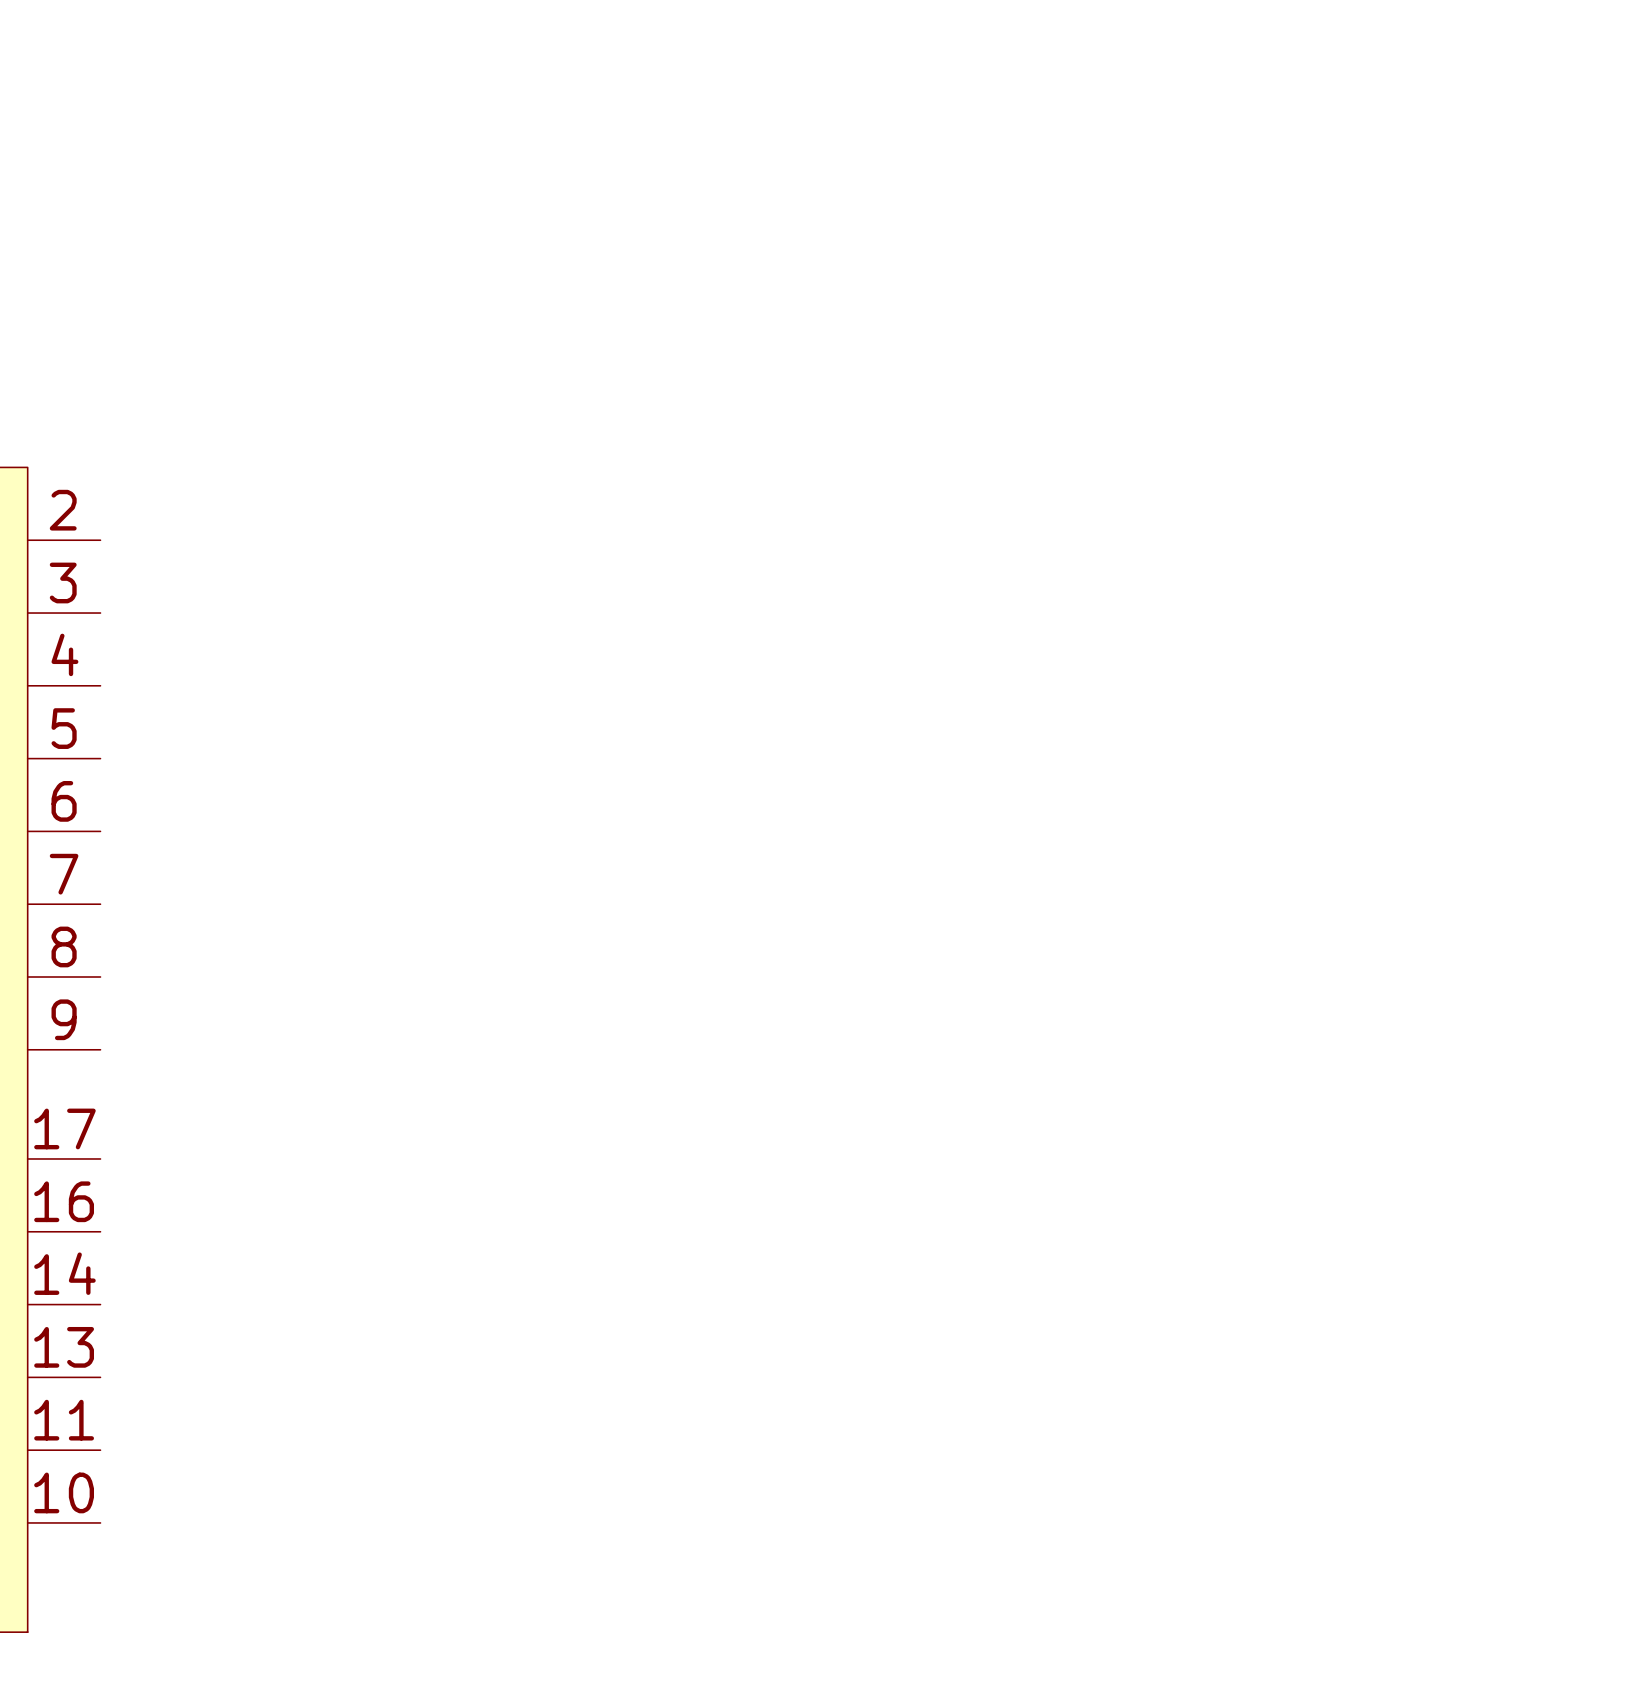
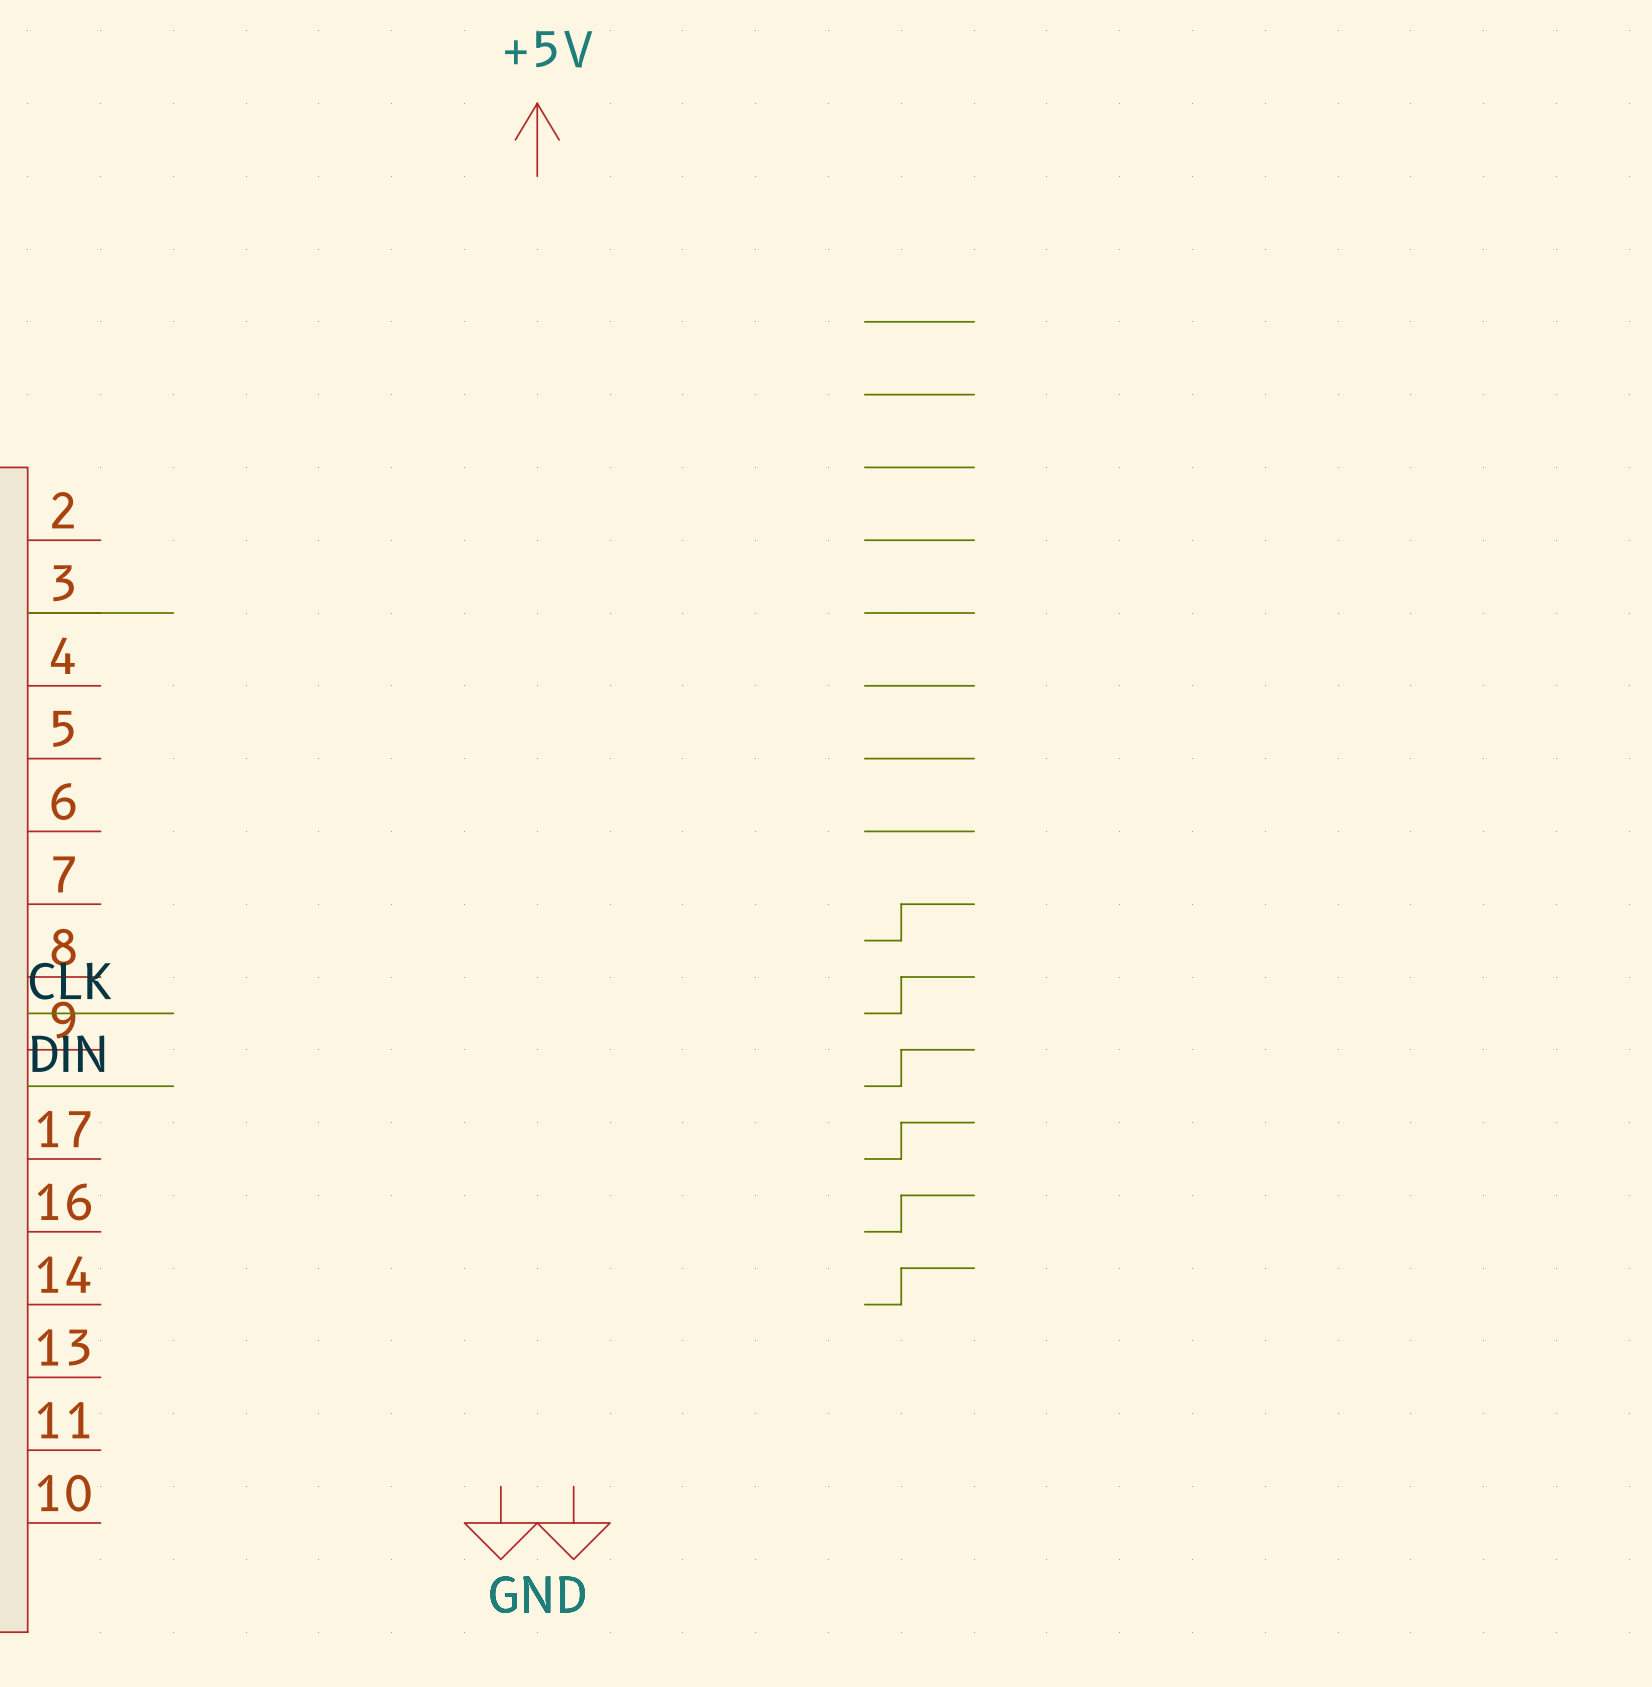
power symbol: none -> +5V (537, 139)
wire: none -> (864, 321) (974, 321)
wire: none -> (864, 394) (974, 394)
wire: none -> (864, 467) (974, 467)
wire: none -> (864, 540) (974, 540)
wire: none -> (27, 613) (173, 613)
wire: none -> (864, 613) (974, 613)
wire: none -> (864, 685) (974, 685)
wire: none -> (864, 758) (974, 758)
wire: none -> (864, 831) (974, 831)
wire: none -> (974, 904) (901, 904) (901, 940) (864, 940)
wire: none -> (974, 977) (901, 977) (901, 1013) (864, 1013)
label: none -> CLK (70, 981)
wire: none -> (27, 1013) (173, 1013)
wire: none -> (974, 1049) (901, 1049) (901, 1086) (864, 1086)
label: none -> DIN (67, 1053)
wire: none -> (27, 1086) (173, 1086)
wire: none -> (974, 1122) (901, 1122) (901, 1158) (864, 1158)
wire: none -> (974, 1195) (901, 1195) (901, 1231) (864, 1231)
wire: none -> (974, 1268) (901, 1268) (901, 1304) (864, 1304)
power symbol: none -> GND (500, 1522)
power symbol: none -> GND (573, 1522)

